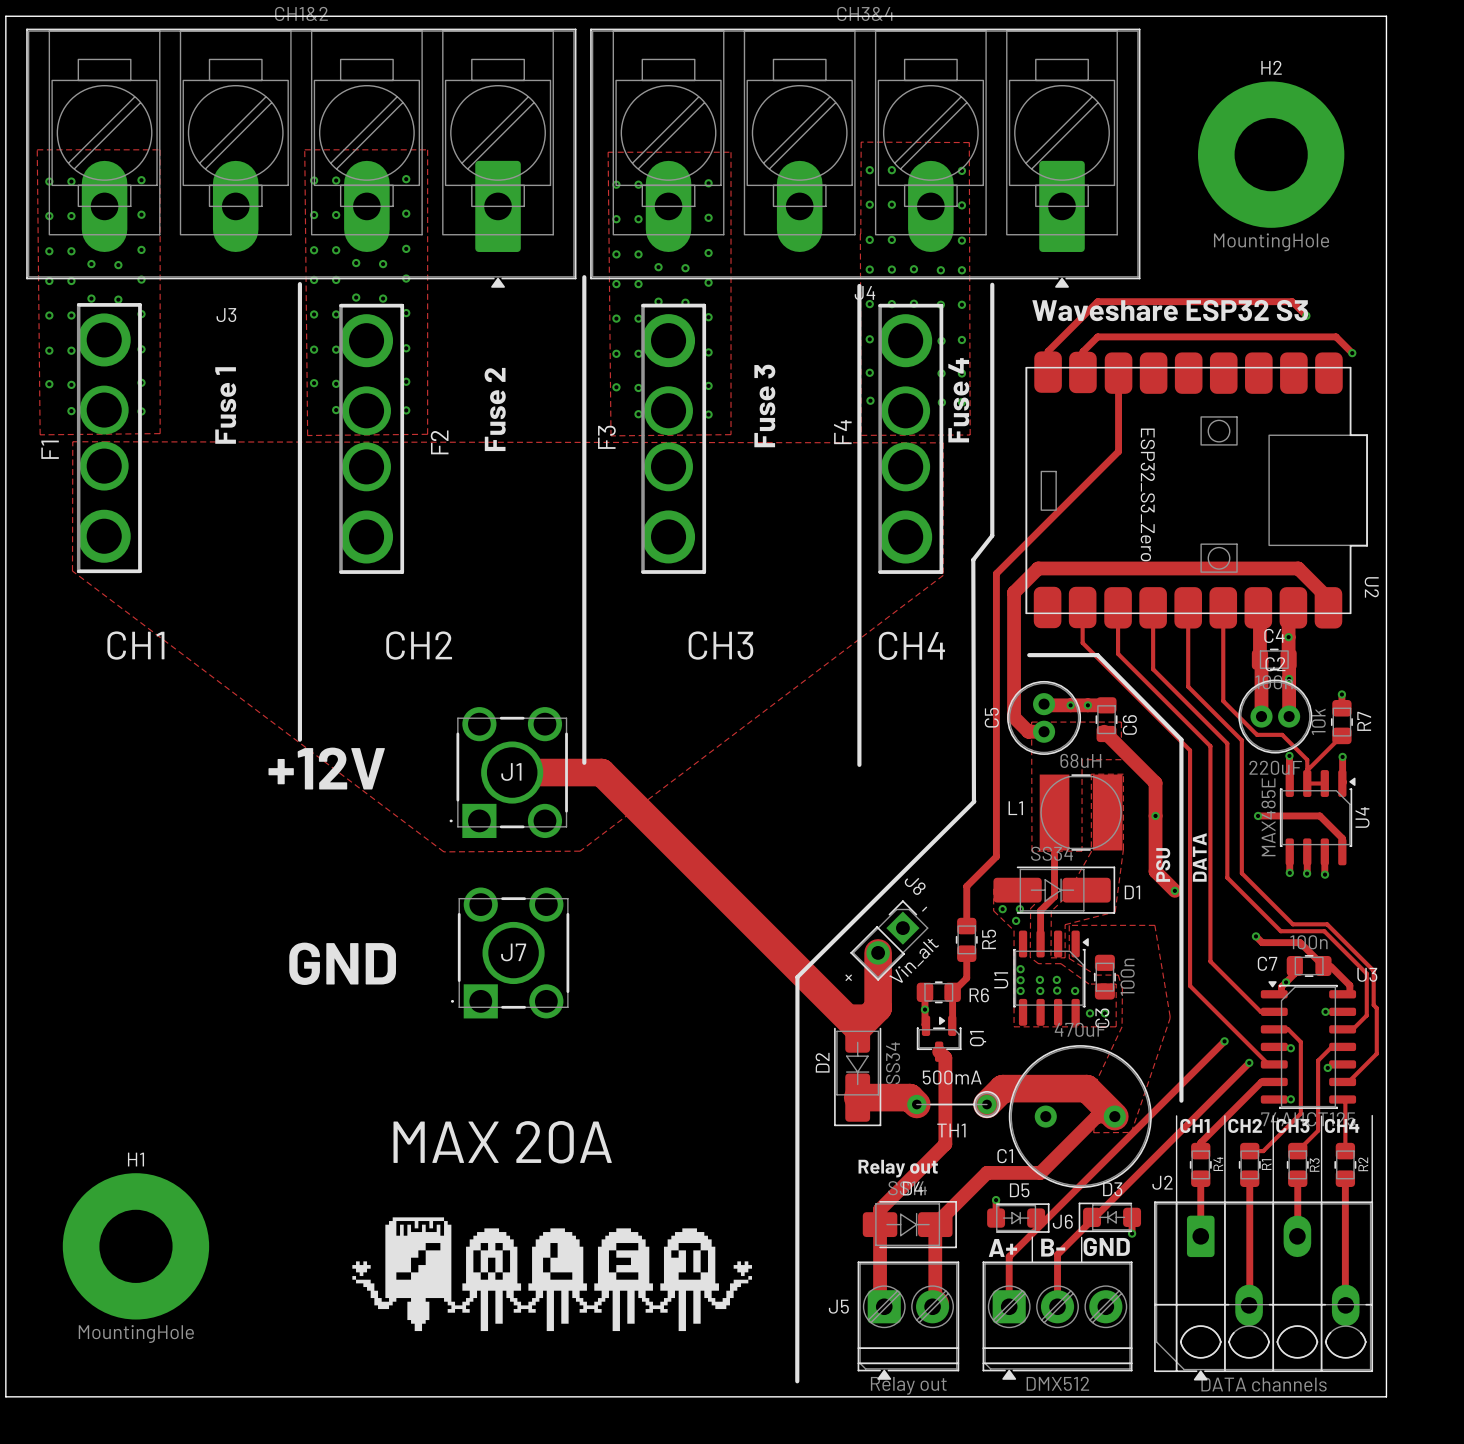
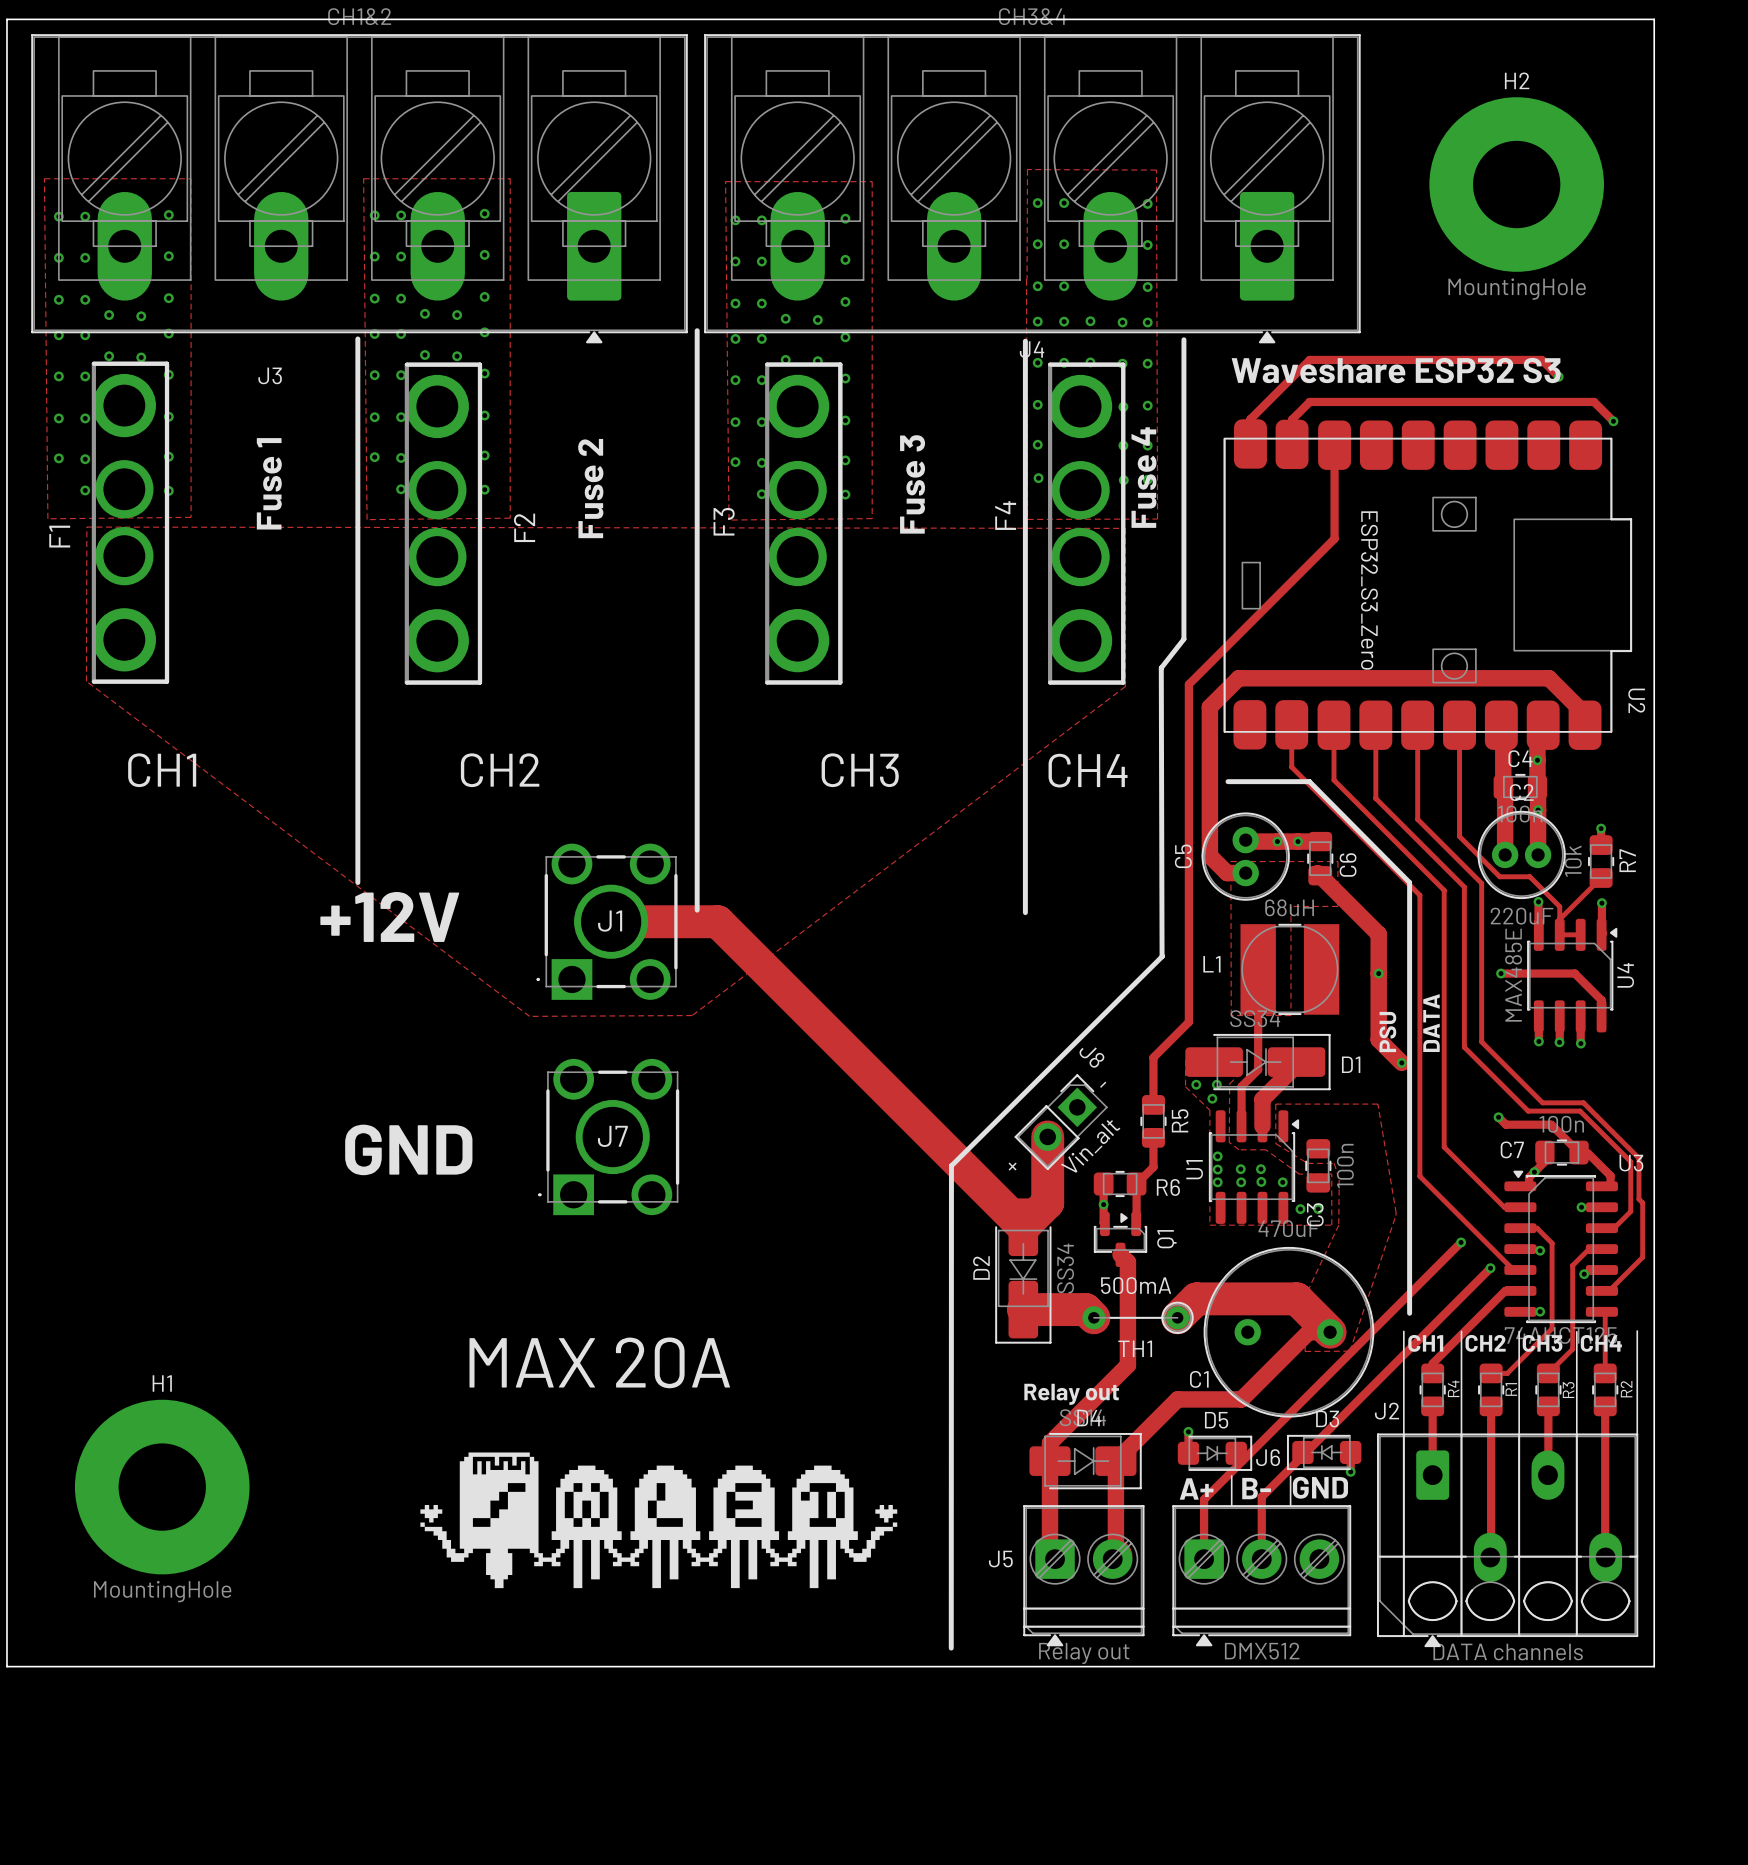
zone outline: (1091, 774) (1123, 774) (1123, 849) (1115, 911) (1065, 924) (1065, 957) (1050, 957) (1051, 911) (1064, 898) (1091, 851) (1091, 774) -> none
track: none -> (1296, 1065) (1262, 1099) (1262, 1126)

